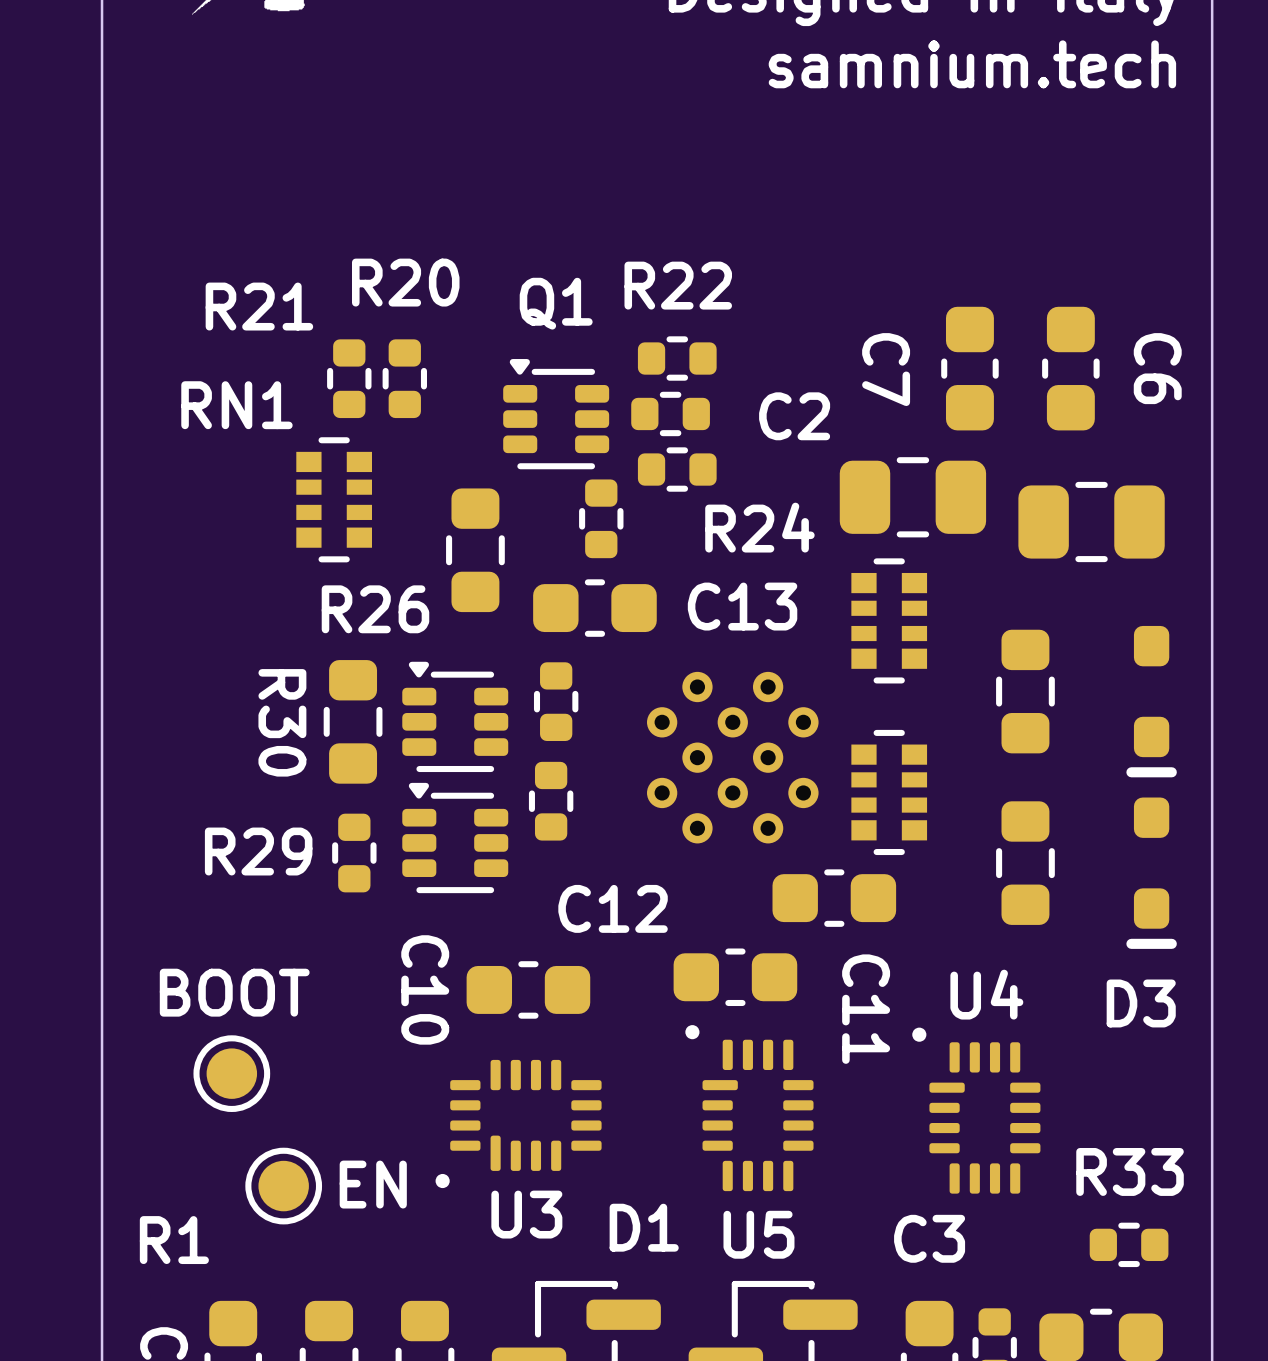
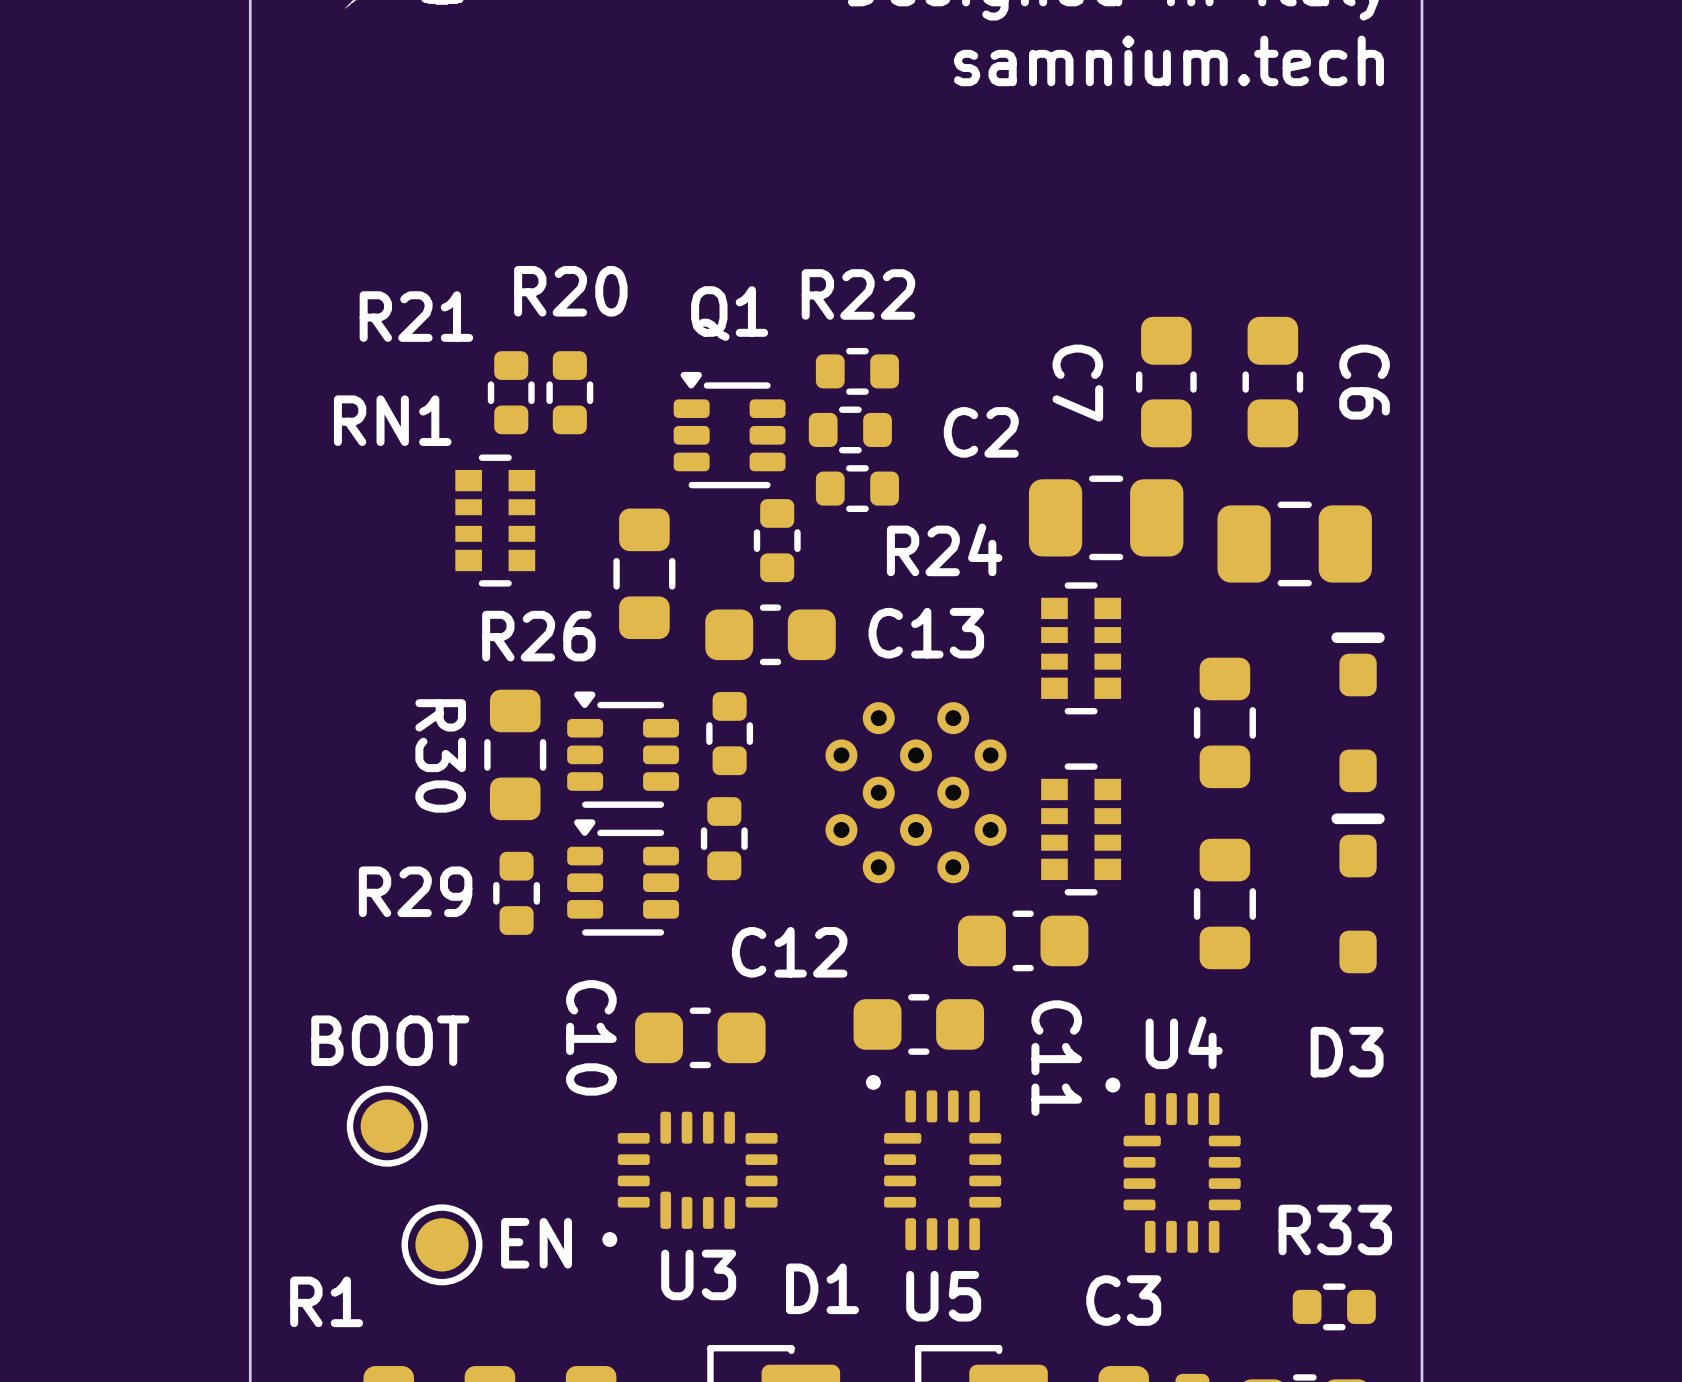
part rotation: 0° (1151, 701) -> 180° (1358, 712)
D3 rotation: 0° (1151, 873) -> 180° (1358, 893)

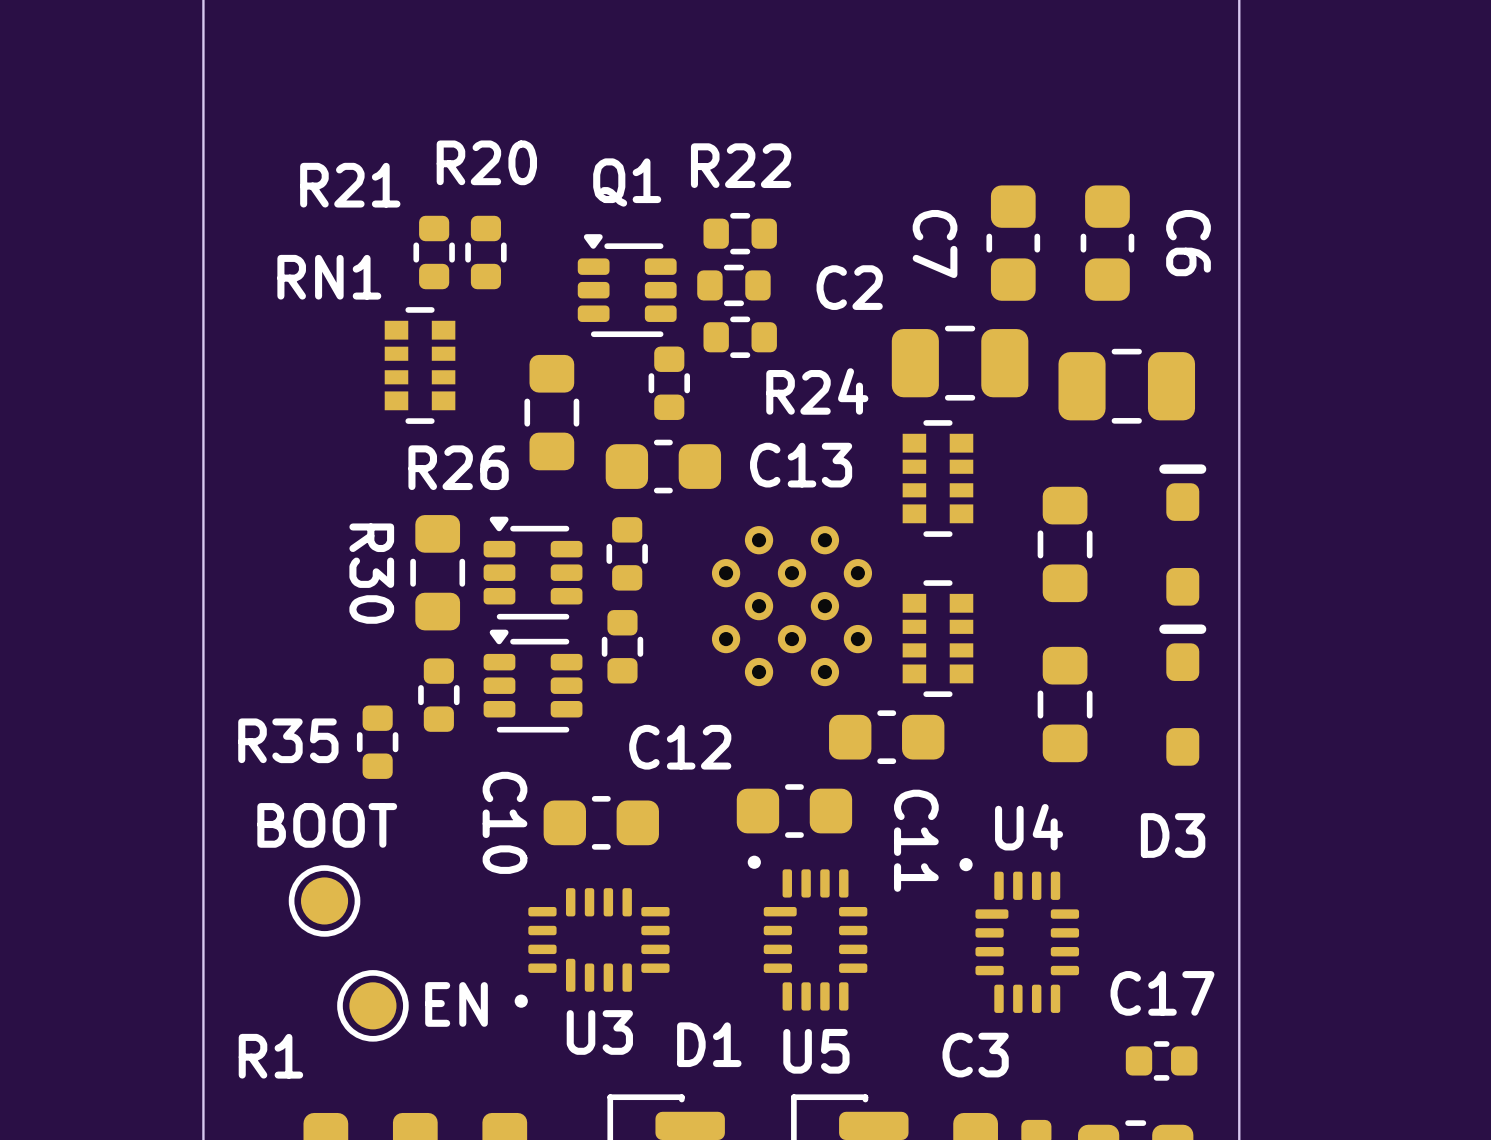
R29 name: R29 (415, 891) -> none
R35: none -> (377, 742)
R33: (1334, 1306) -> none
C17: none -> (1161, 1060)

